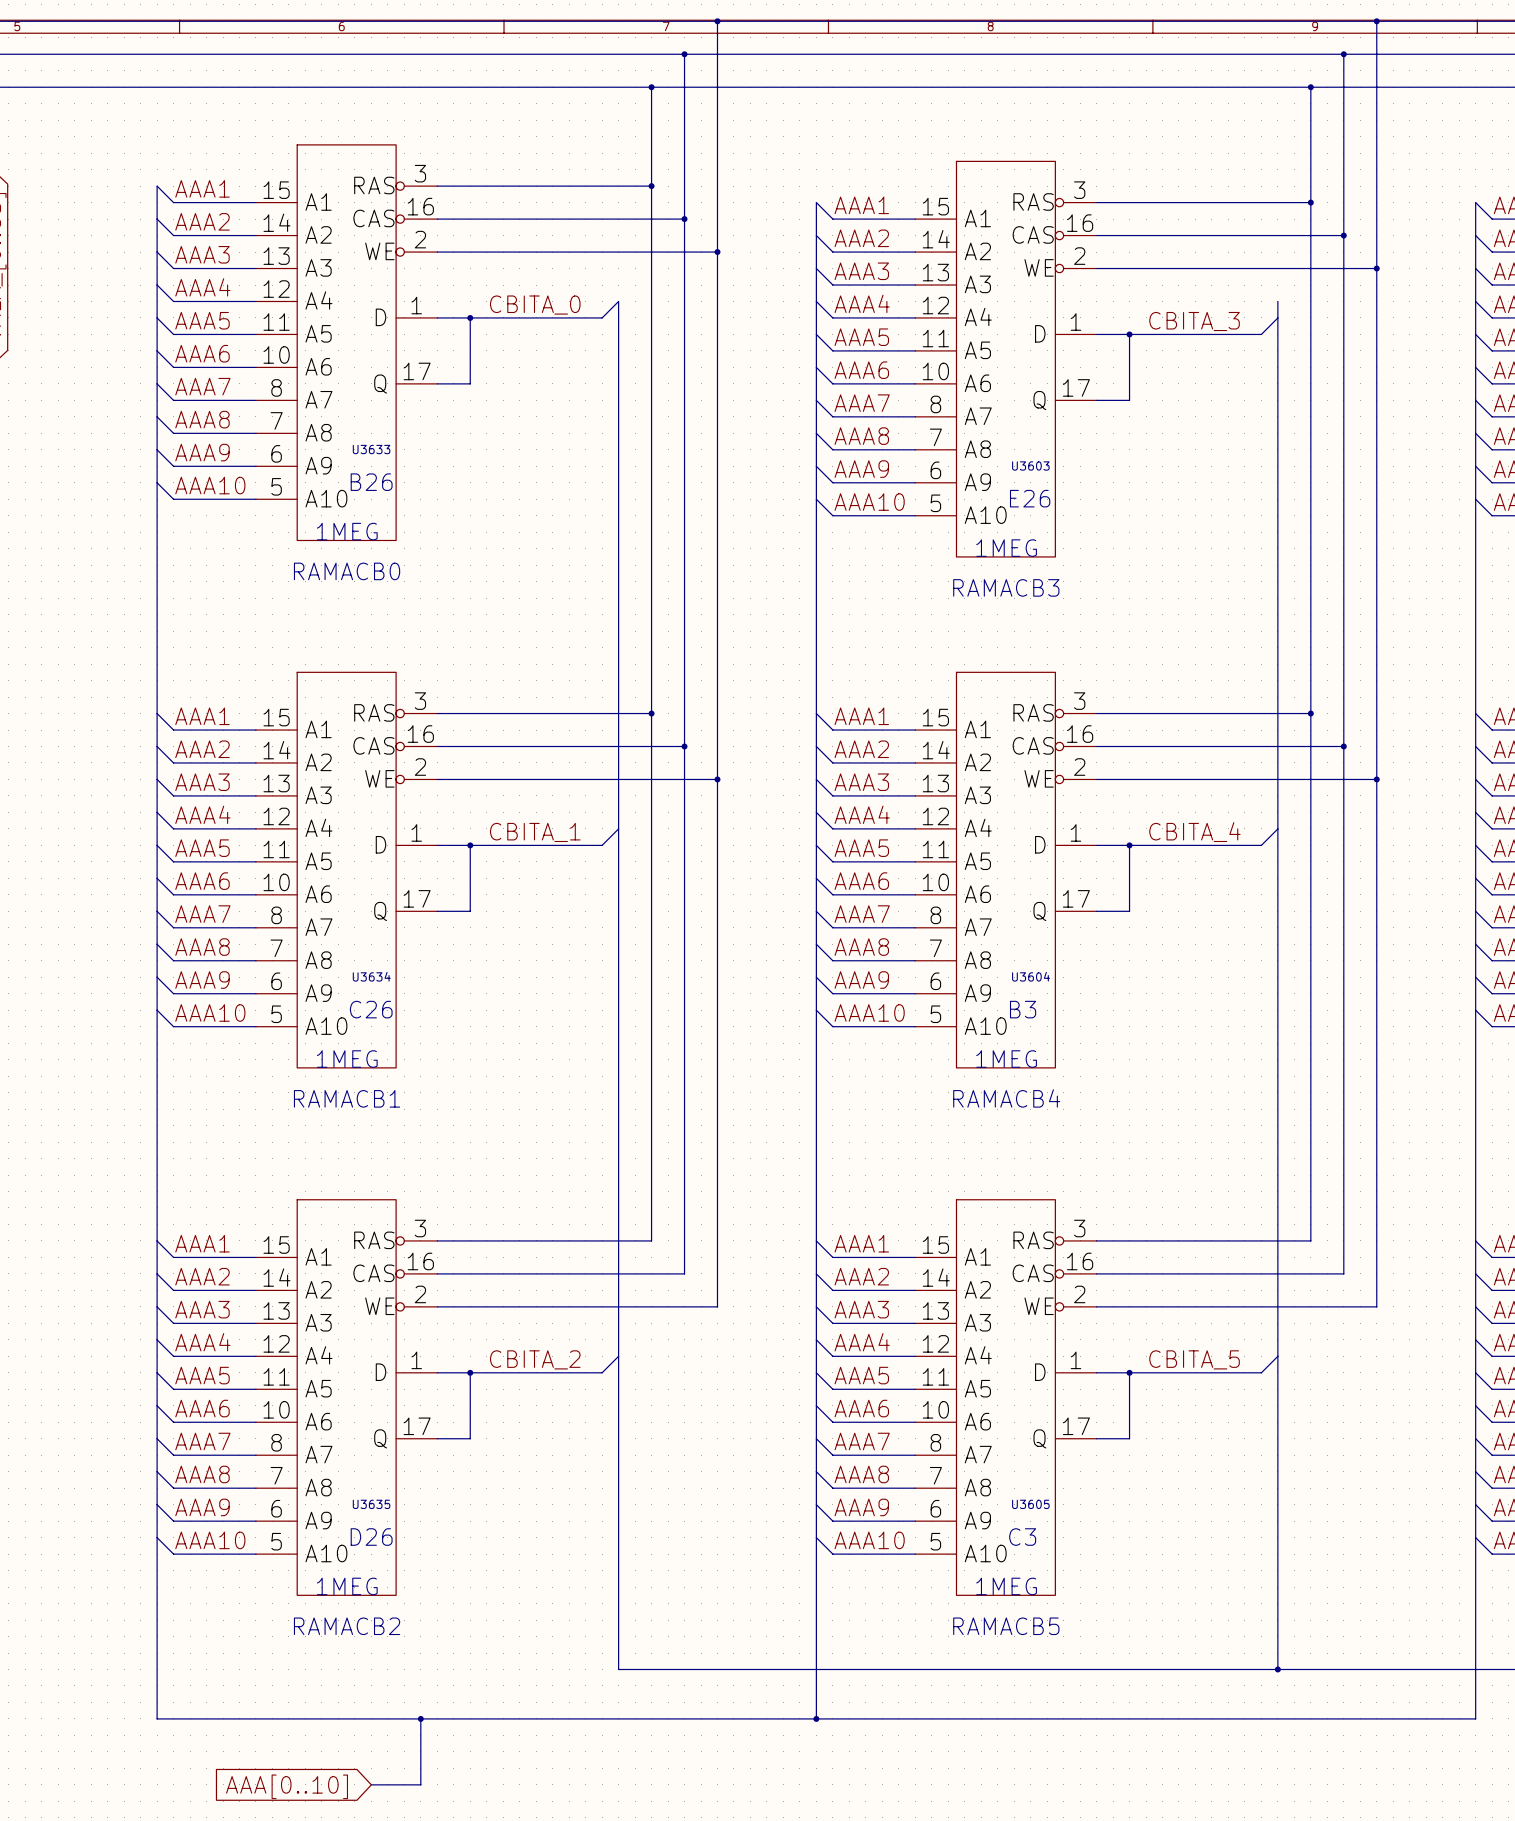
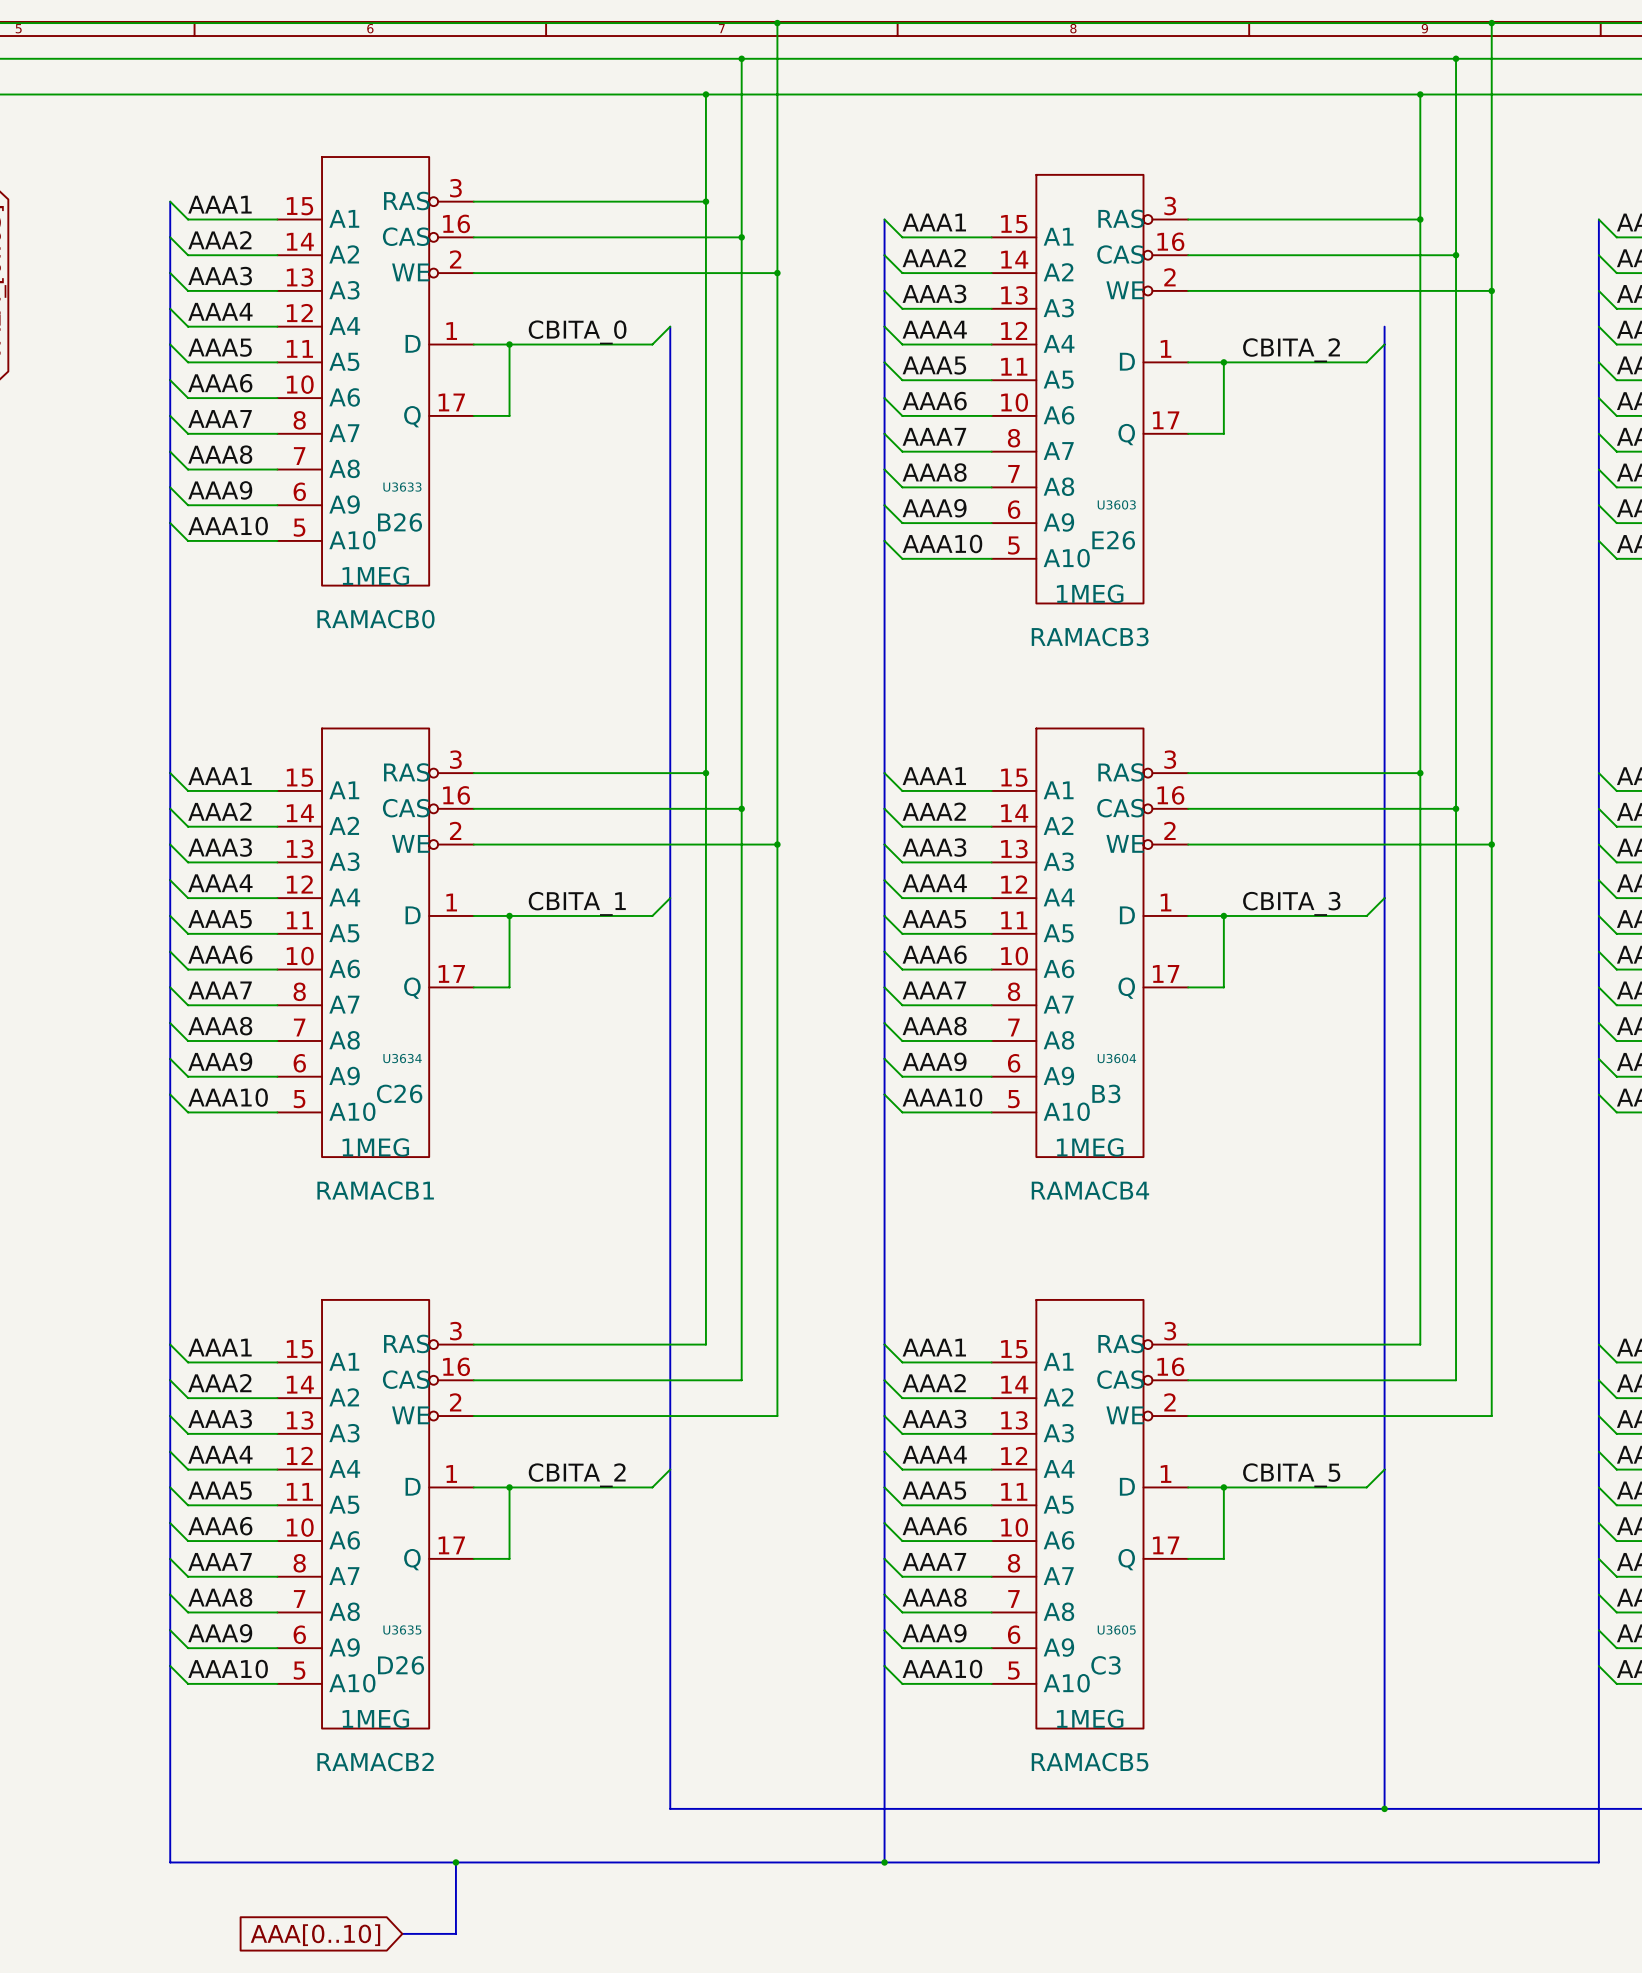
label: CBITA_3 (1194, 321) -> CBITA_2 (1291, 350)
label: CBITA_4 (1194, 832) -> CBITA_3 (1291, 903)

